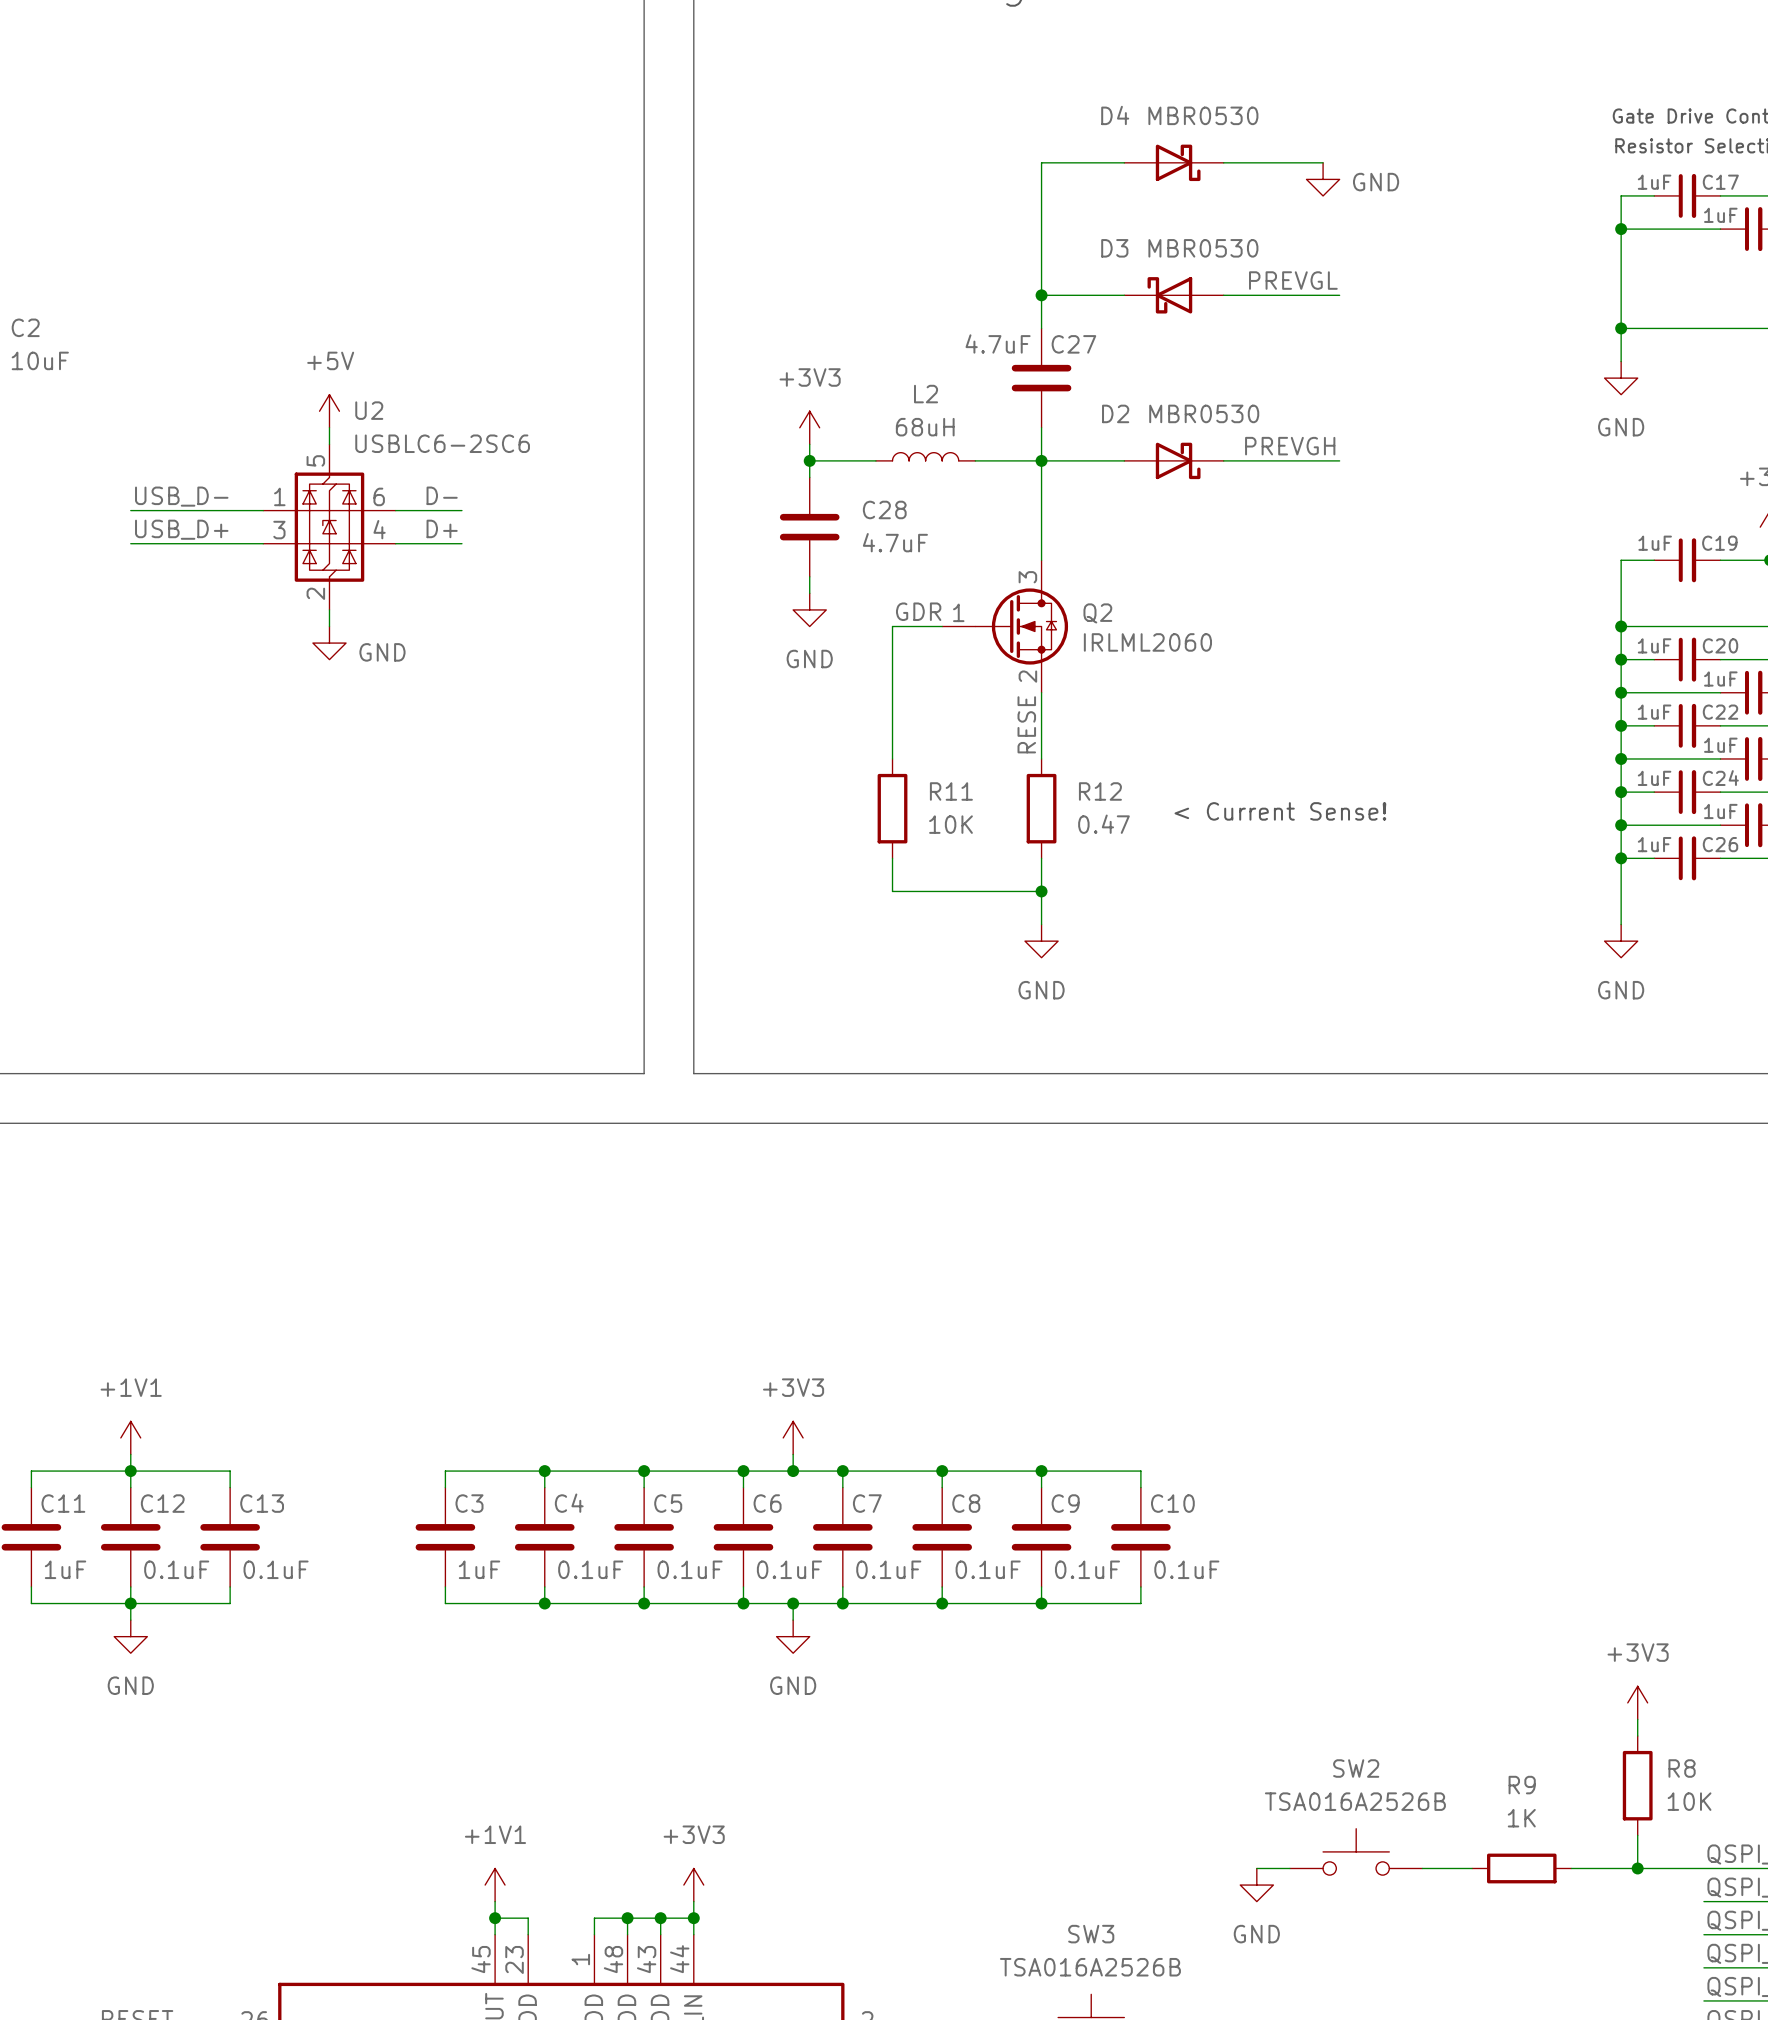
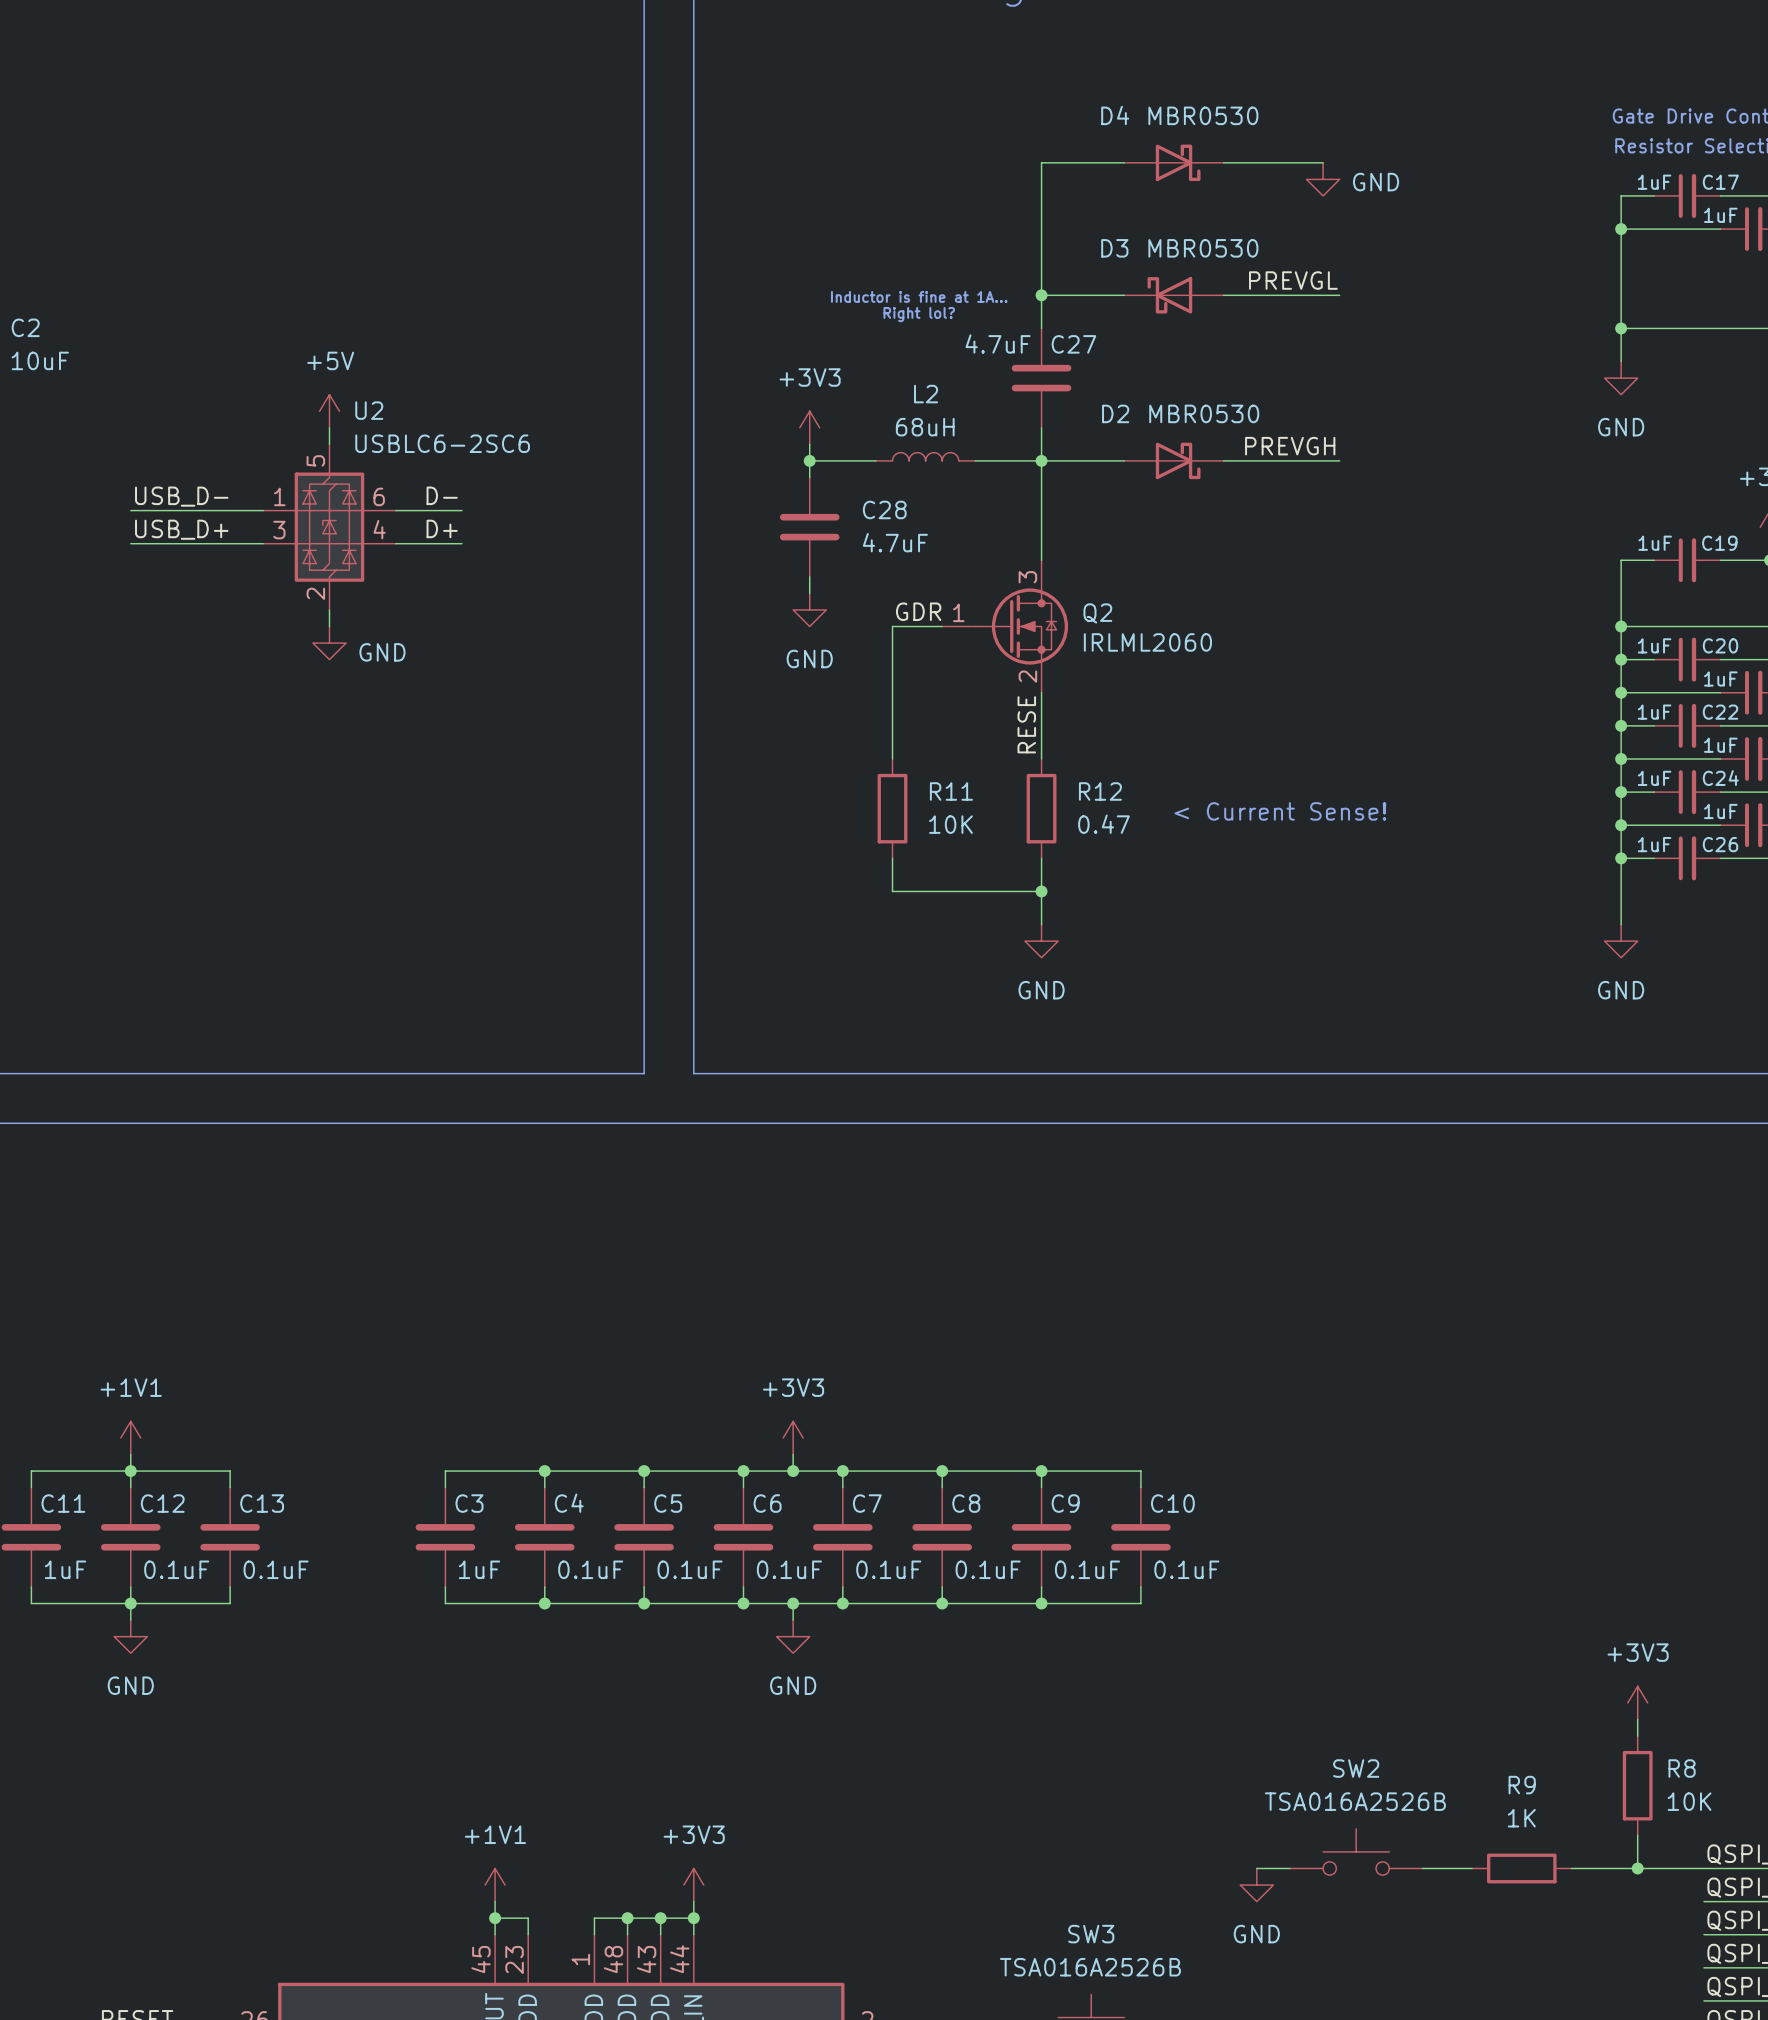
text: none -> Inductor is fine at 1A... (919, 296)
text: none -> Right lol? (919, 314)

